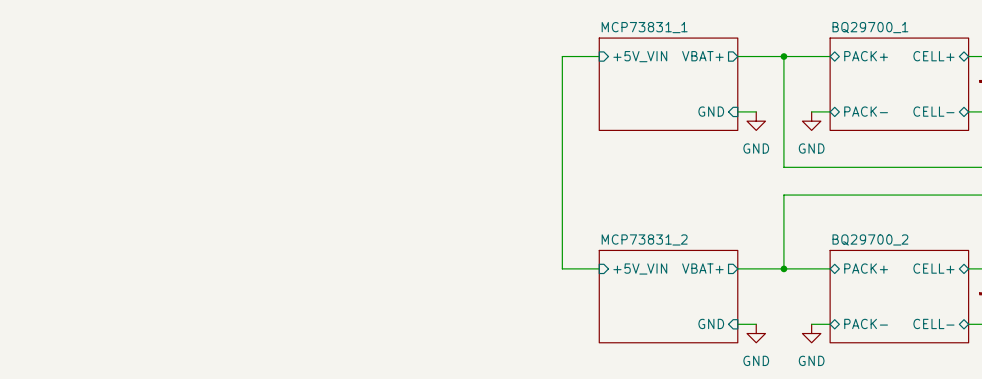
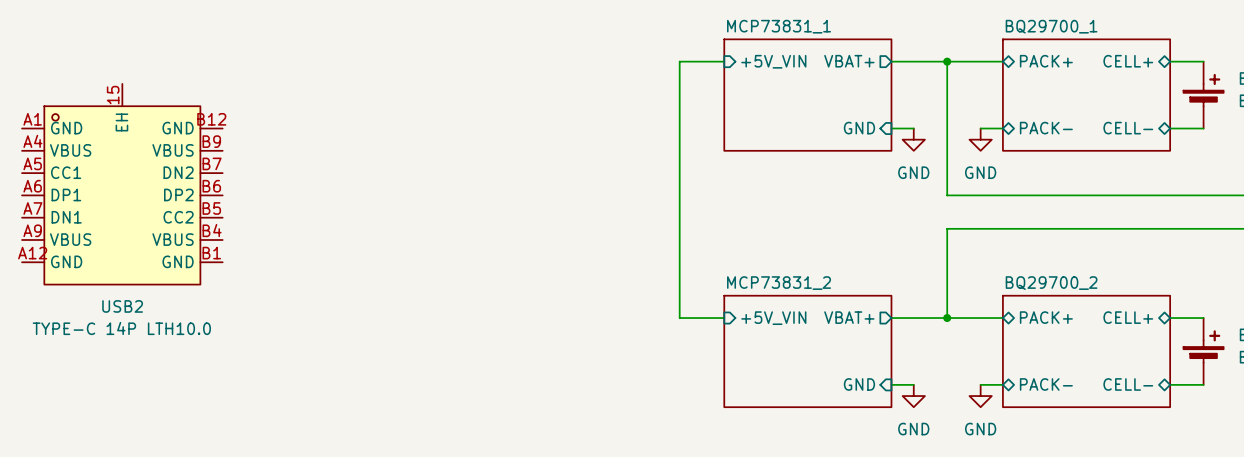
USB2: none -> TYPE-C 14P LTH10.0 (122, 184)

